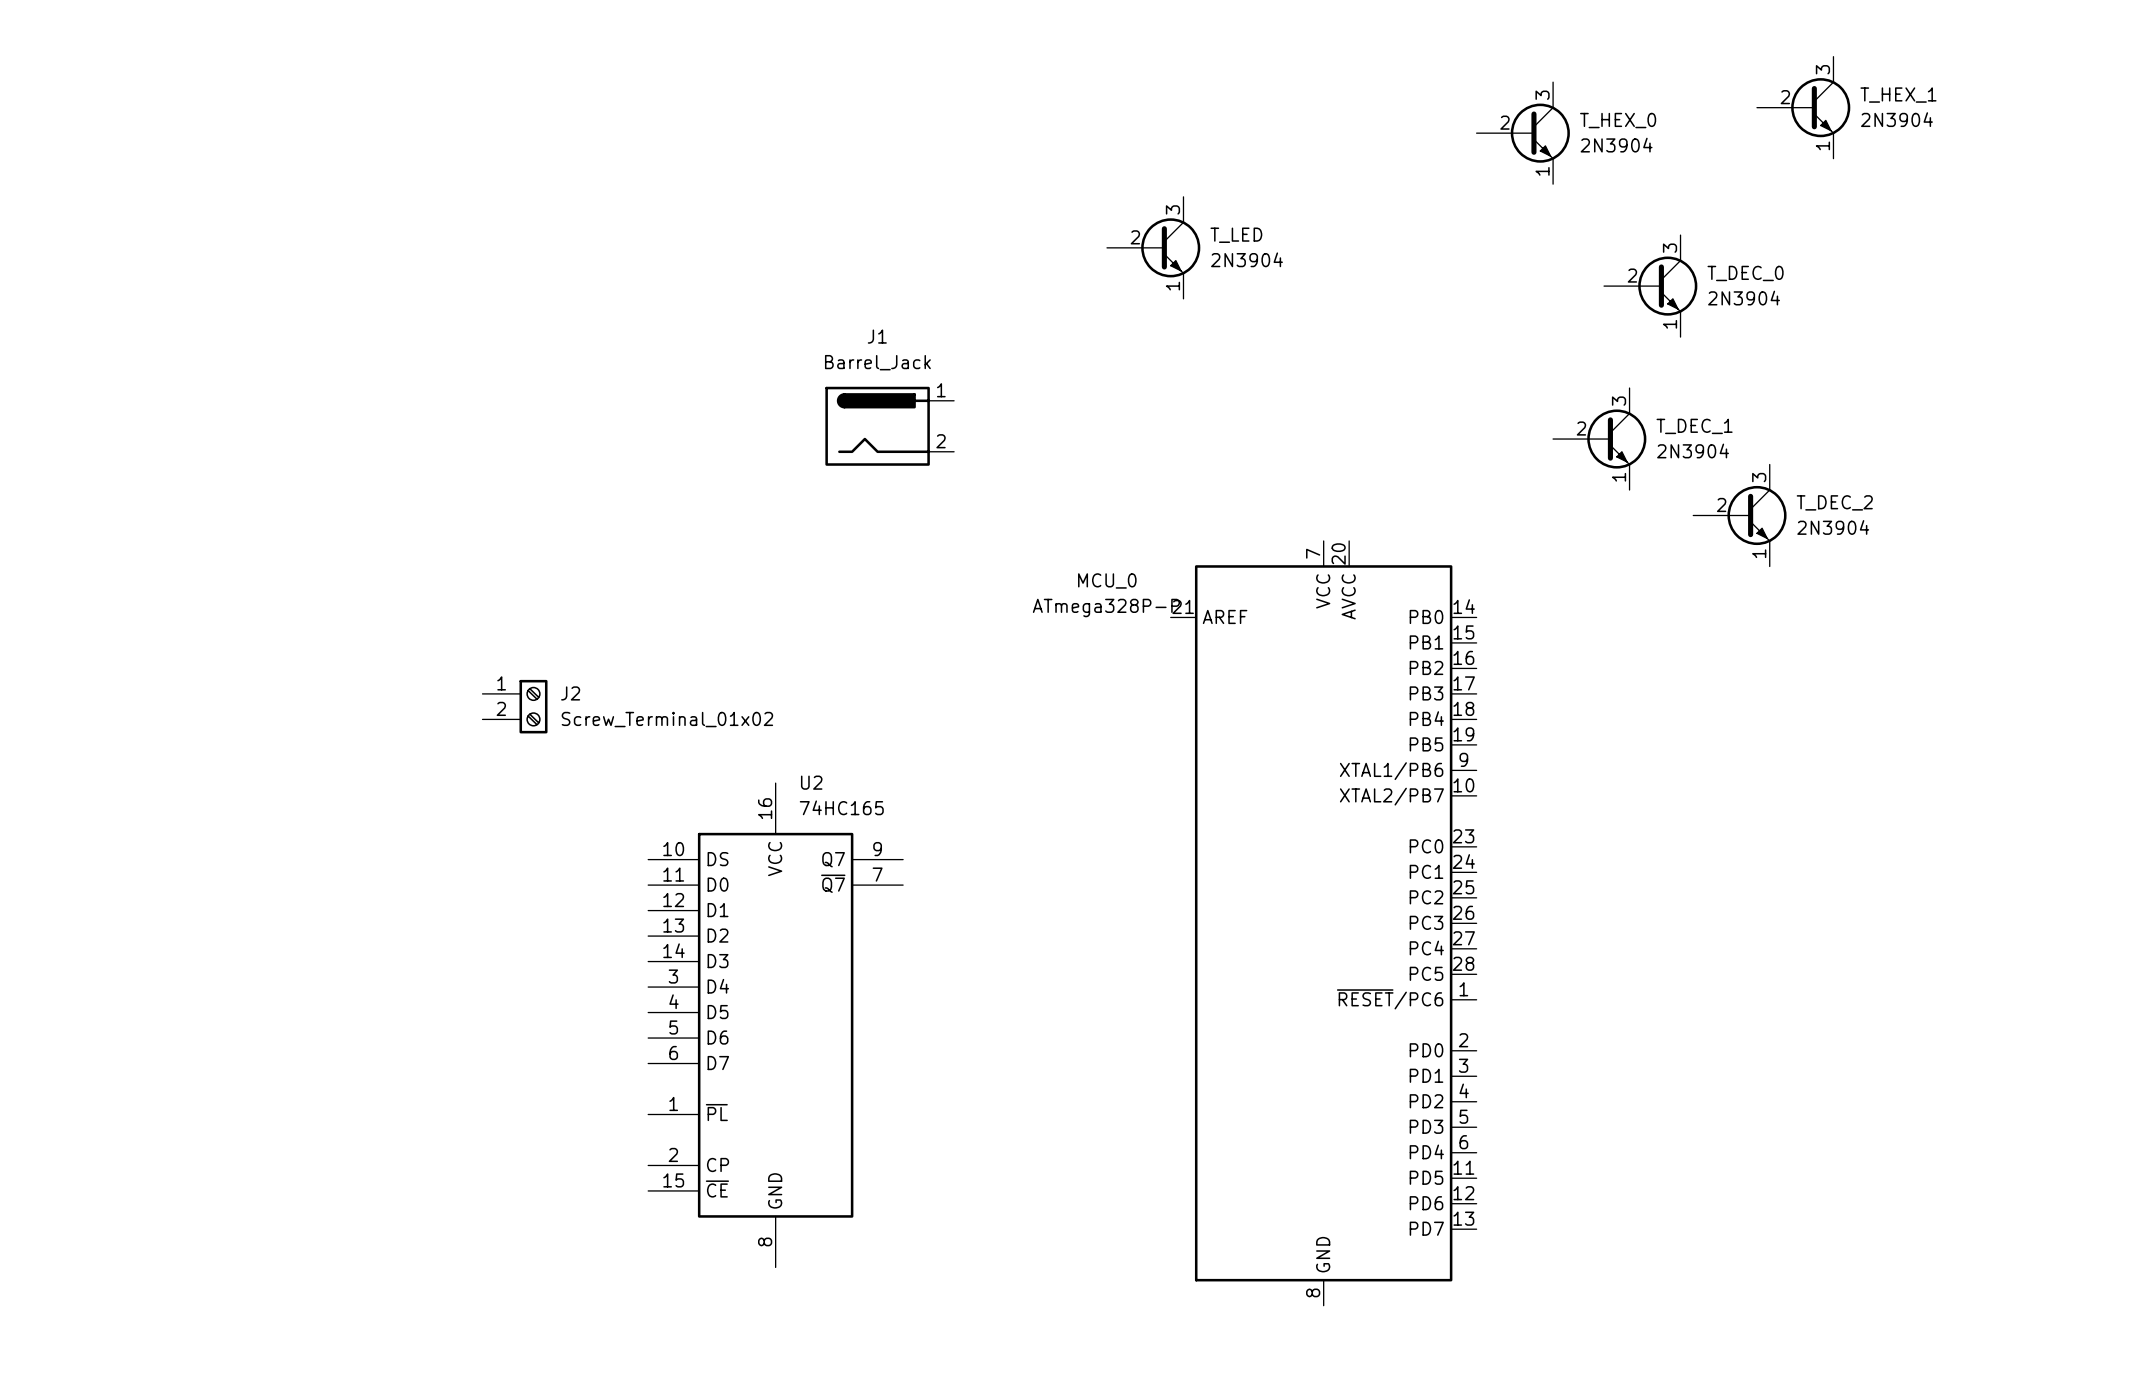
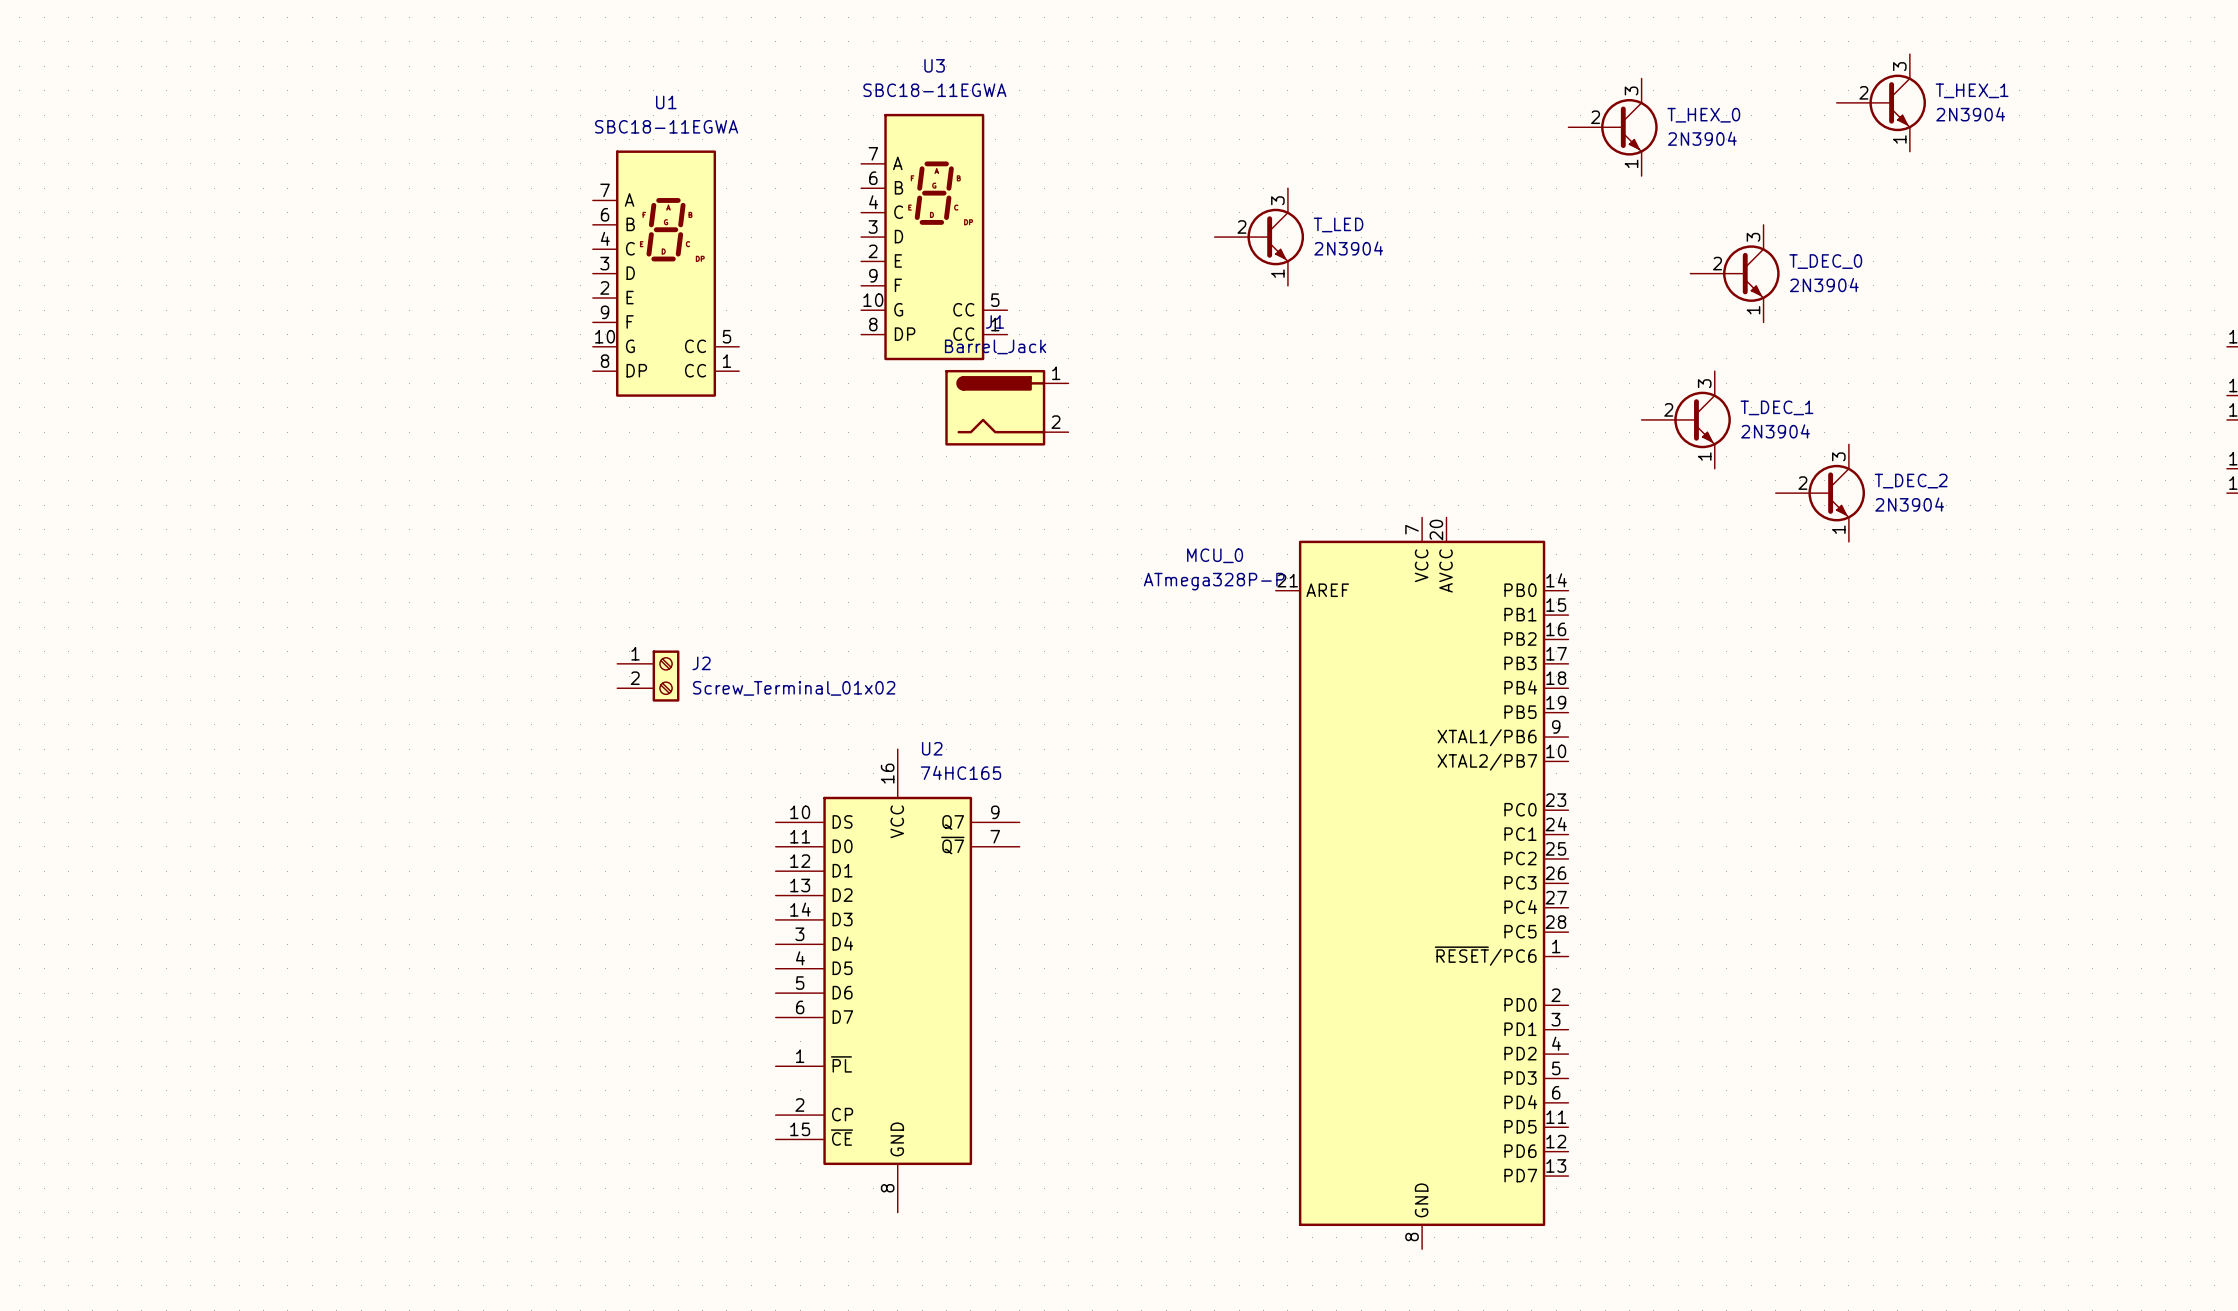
U3: none -> SBC18-11EGWA (934, 237)
U1: none -> SBC18-11EGWA (666, 273)

